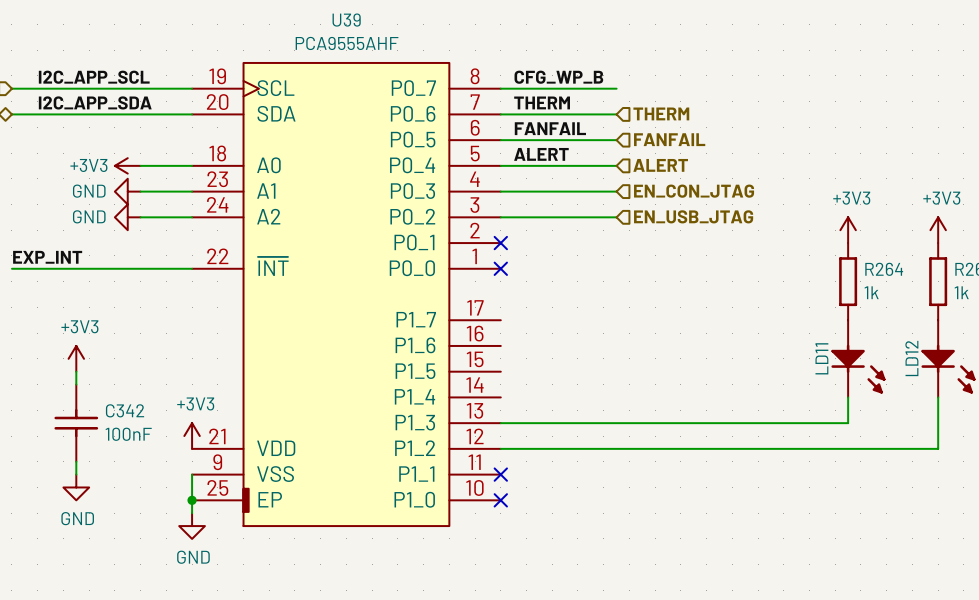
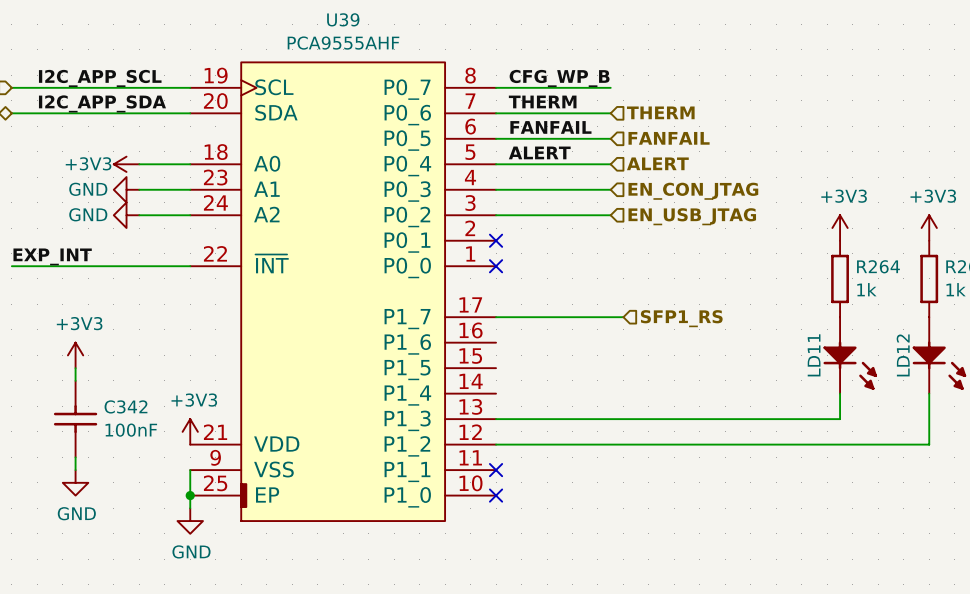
hierarchical label: none -> SFP1_RS (681, 318)
wire: none -> (496, 317) (623, 317)

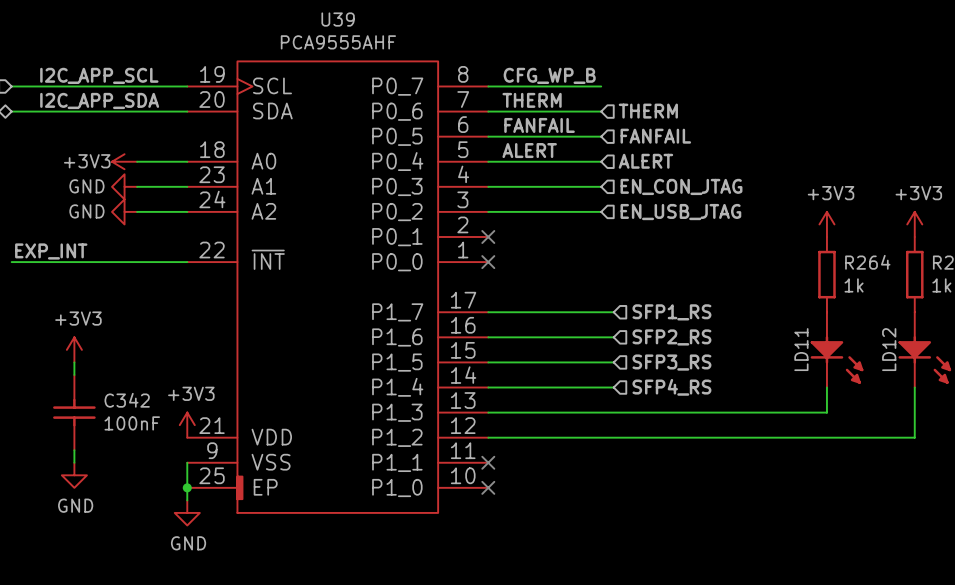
wire: none -> (488, 337) (613, 337)
hierarchical label: none -> SFP2_RS (671, 337)
wire: none -> (488, 362) (613, 362)
hierarchical label: none -> SFP3_RS (671, 362)
wire: none -> (488, 387) (613, 387)
hierarchical label: none -> SFP4_RS (671, 387)

